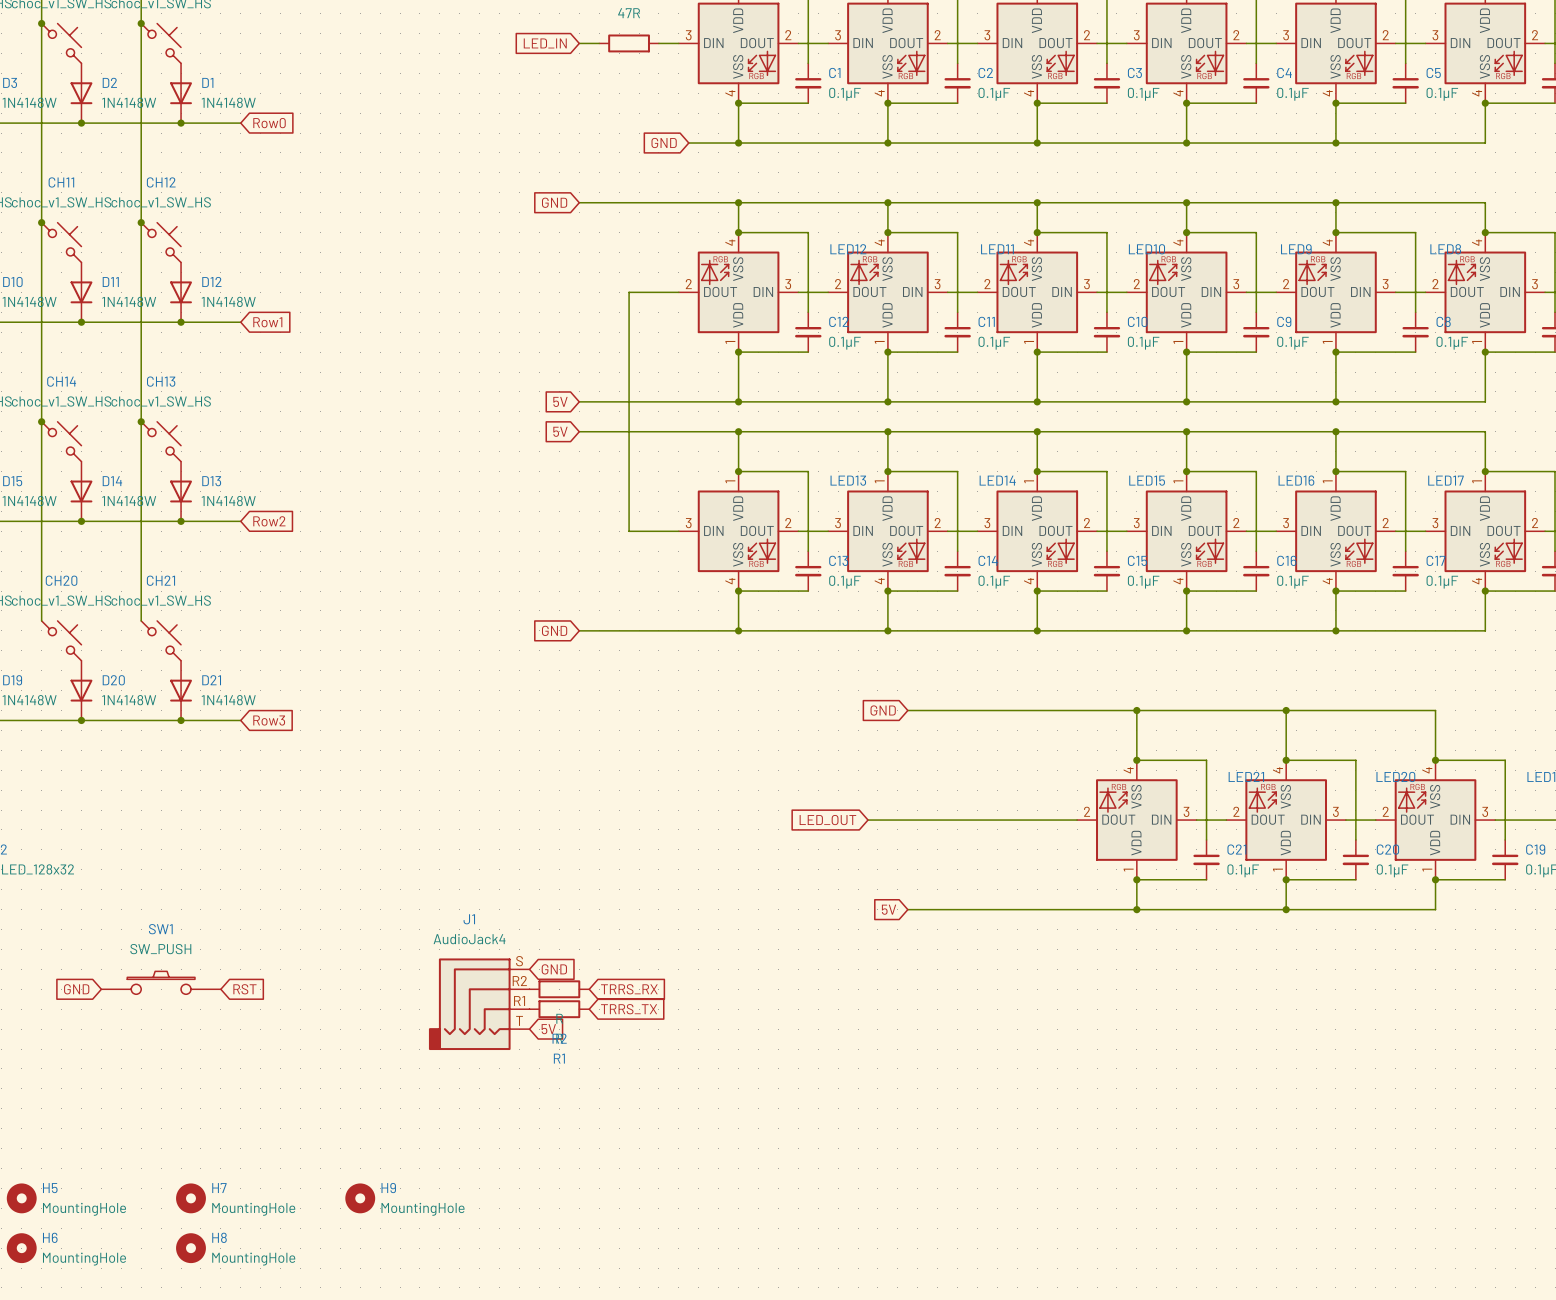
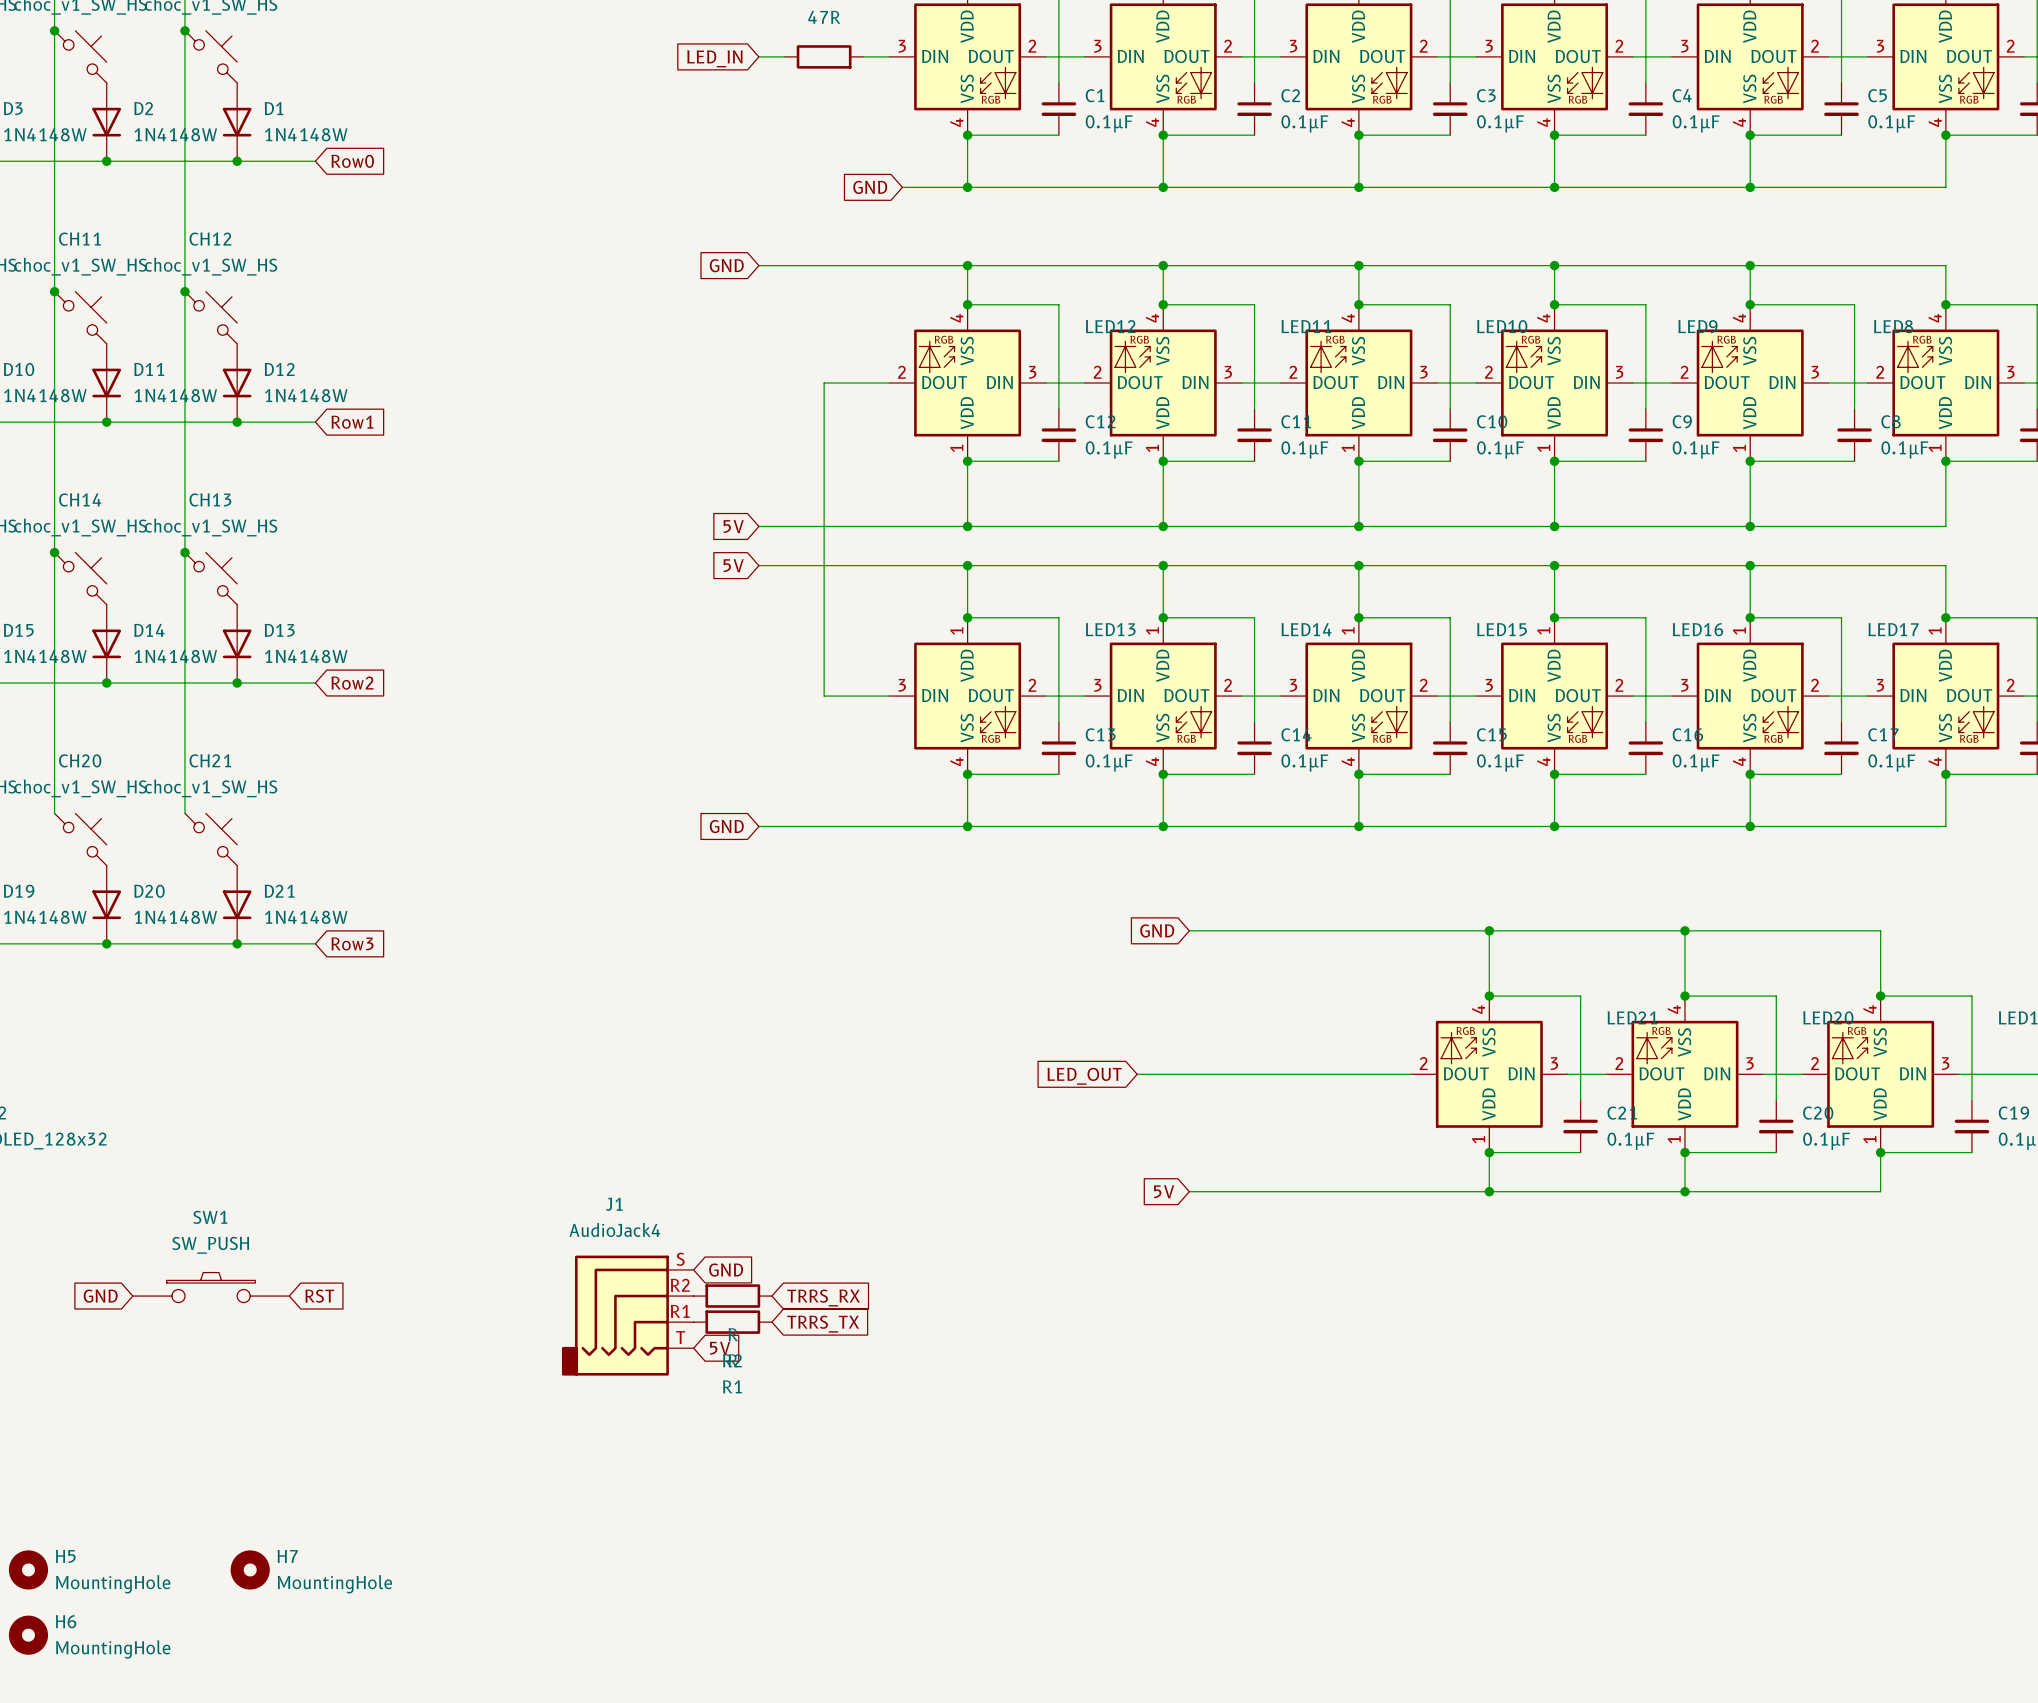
H9: MountingHole (360, 1198) -> none
H8: MountingHole (190, 1248) -> none

